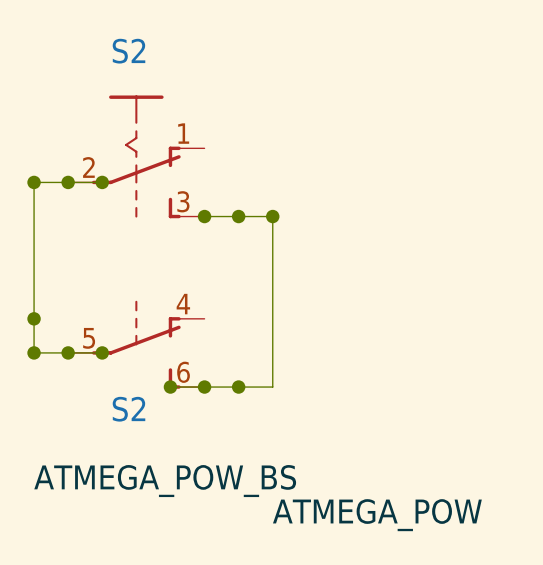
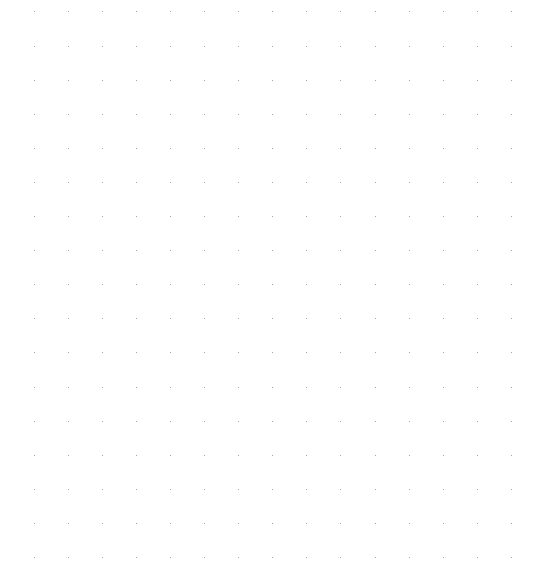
S2: (136, 156) -> none
junction: (34, 182) -> none
junction: (68, 182) -> none
wire: (102, 182) (34, 182) (34, 352) (102, 352) -> none
junction: (102, 182) -> none
wire: (204, 216) (272, 216) (272, 387) (170, 387) -> none
junction: (204, 216) -> none
junction: (238, 216) -> none
junction: (272, 216) -> none
junction: (34, 318) -> none
S2: (136, 344) -> none
junction: (34, 352) -> none
junction: (68, 352) -> none
junction: (102, 352) -> none
junction: (170, 387) -> none
junction: (204, 387) -> none
junction: (238, 387) -> none
label: ATMEGA_POW_BS (165, 481) -> none
label: ATMEGA_POW (377, 515) -> none

